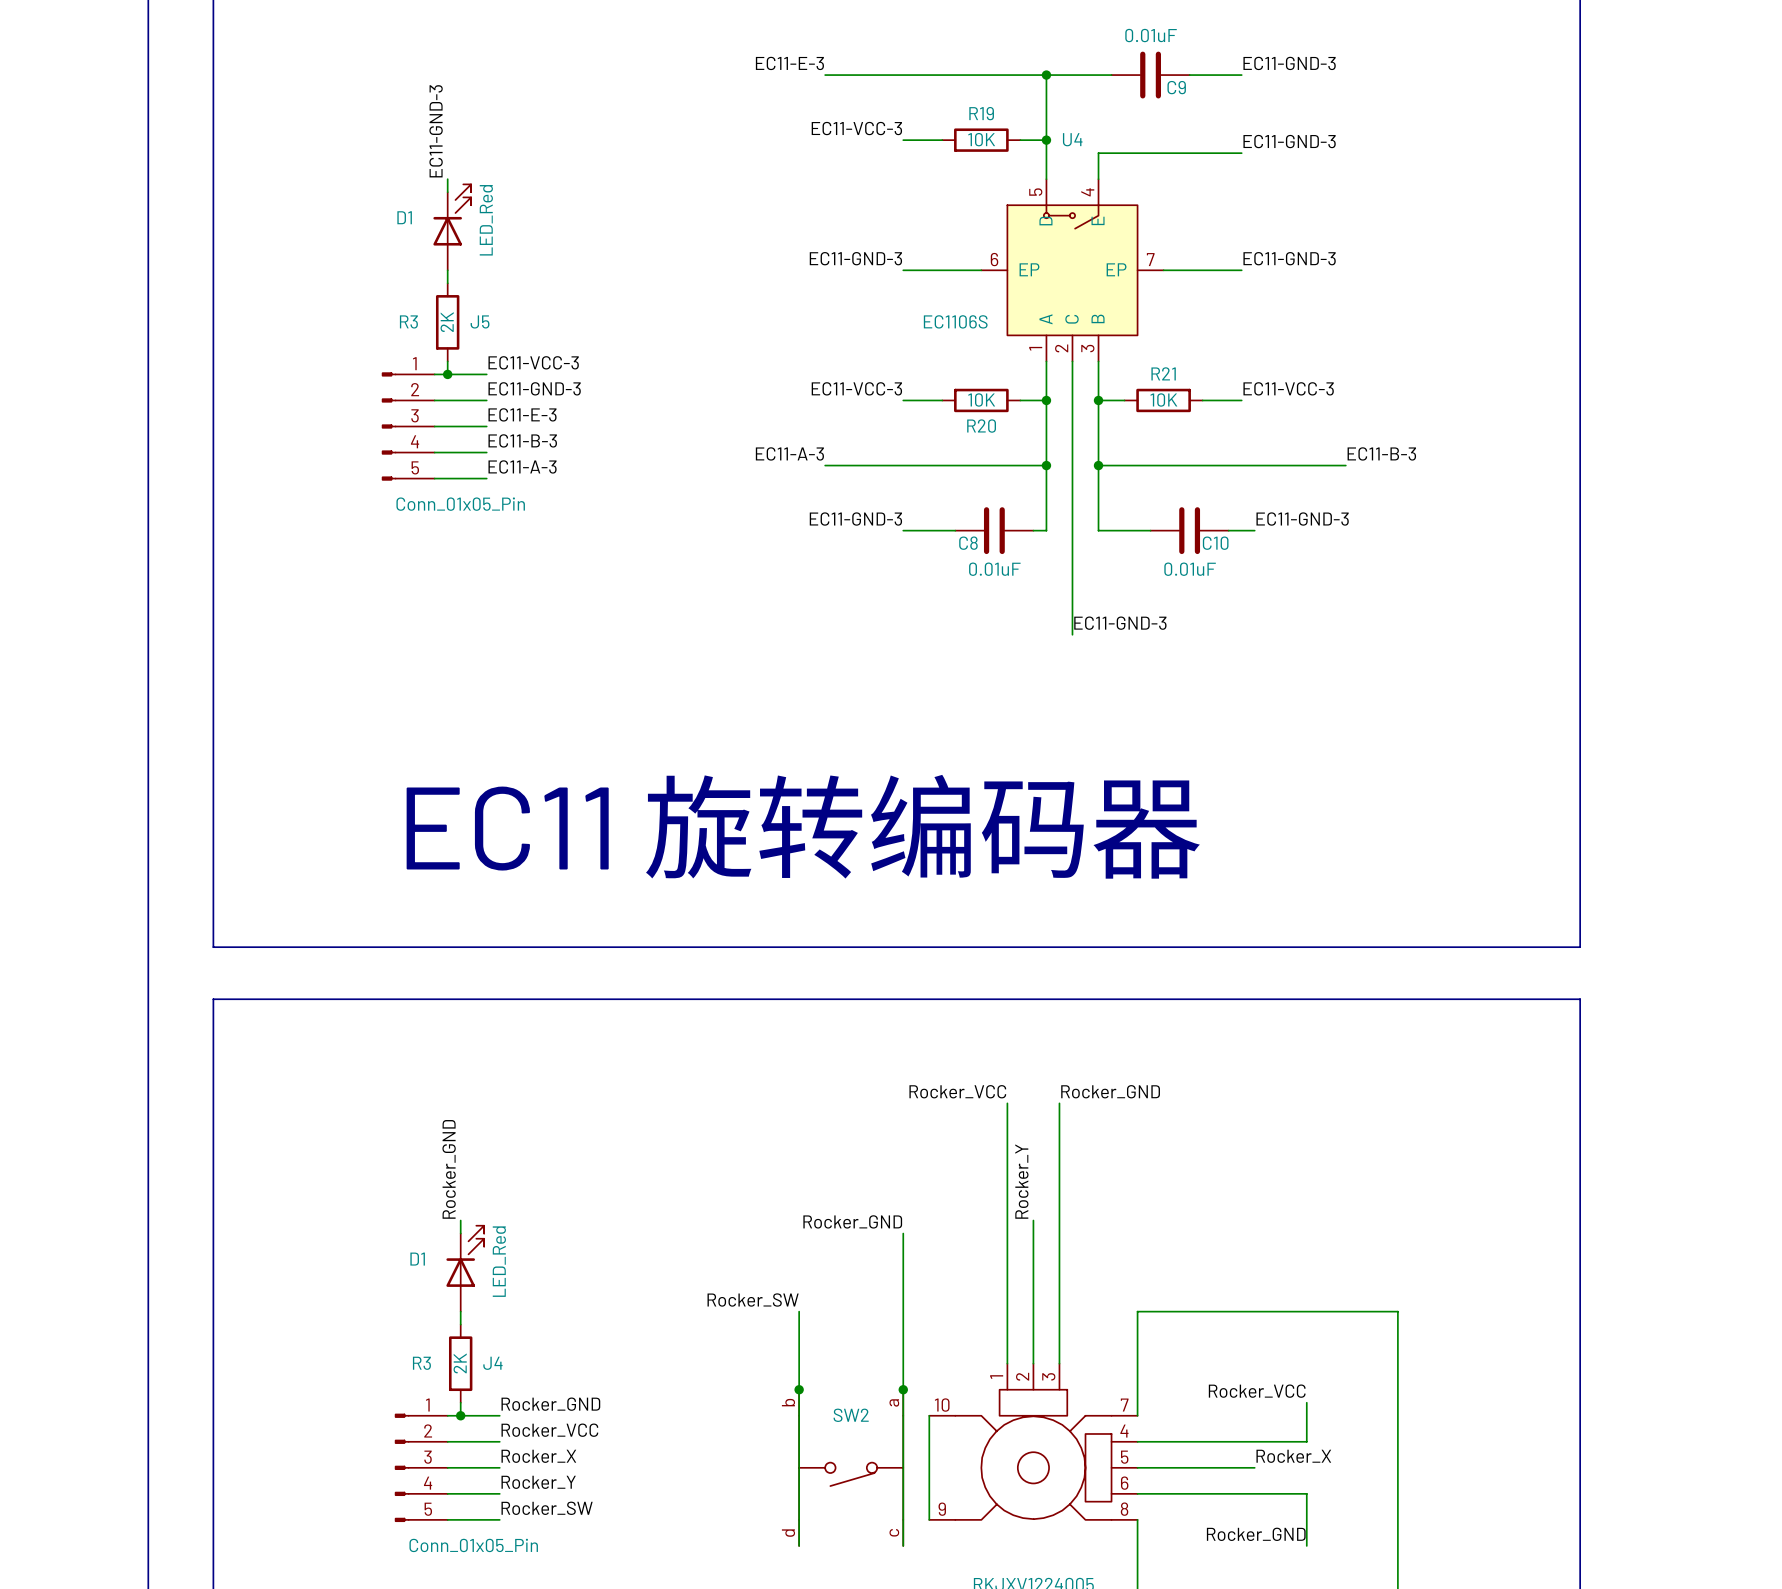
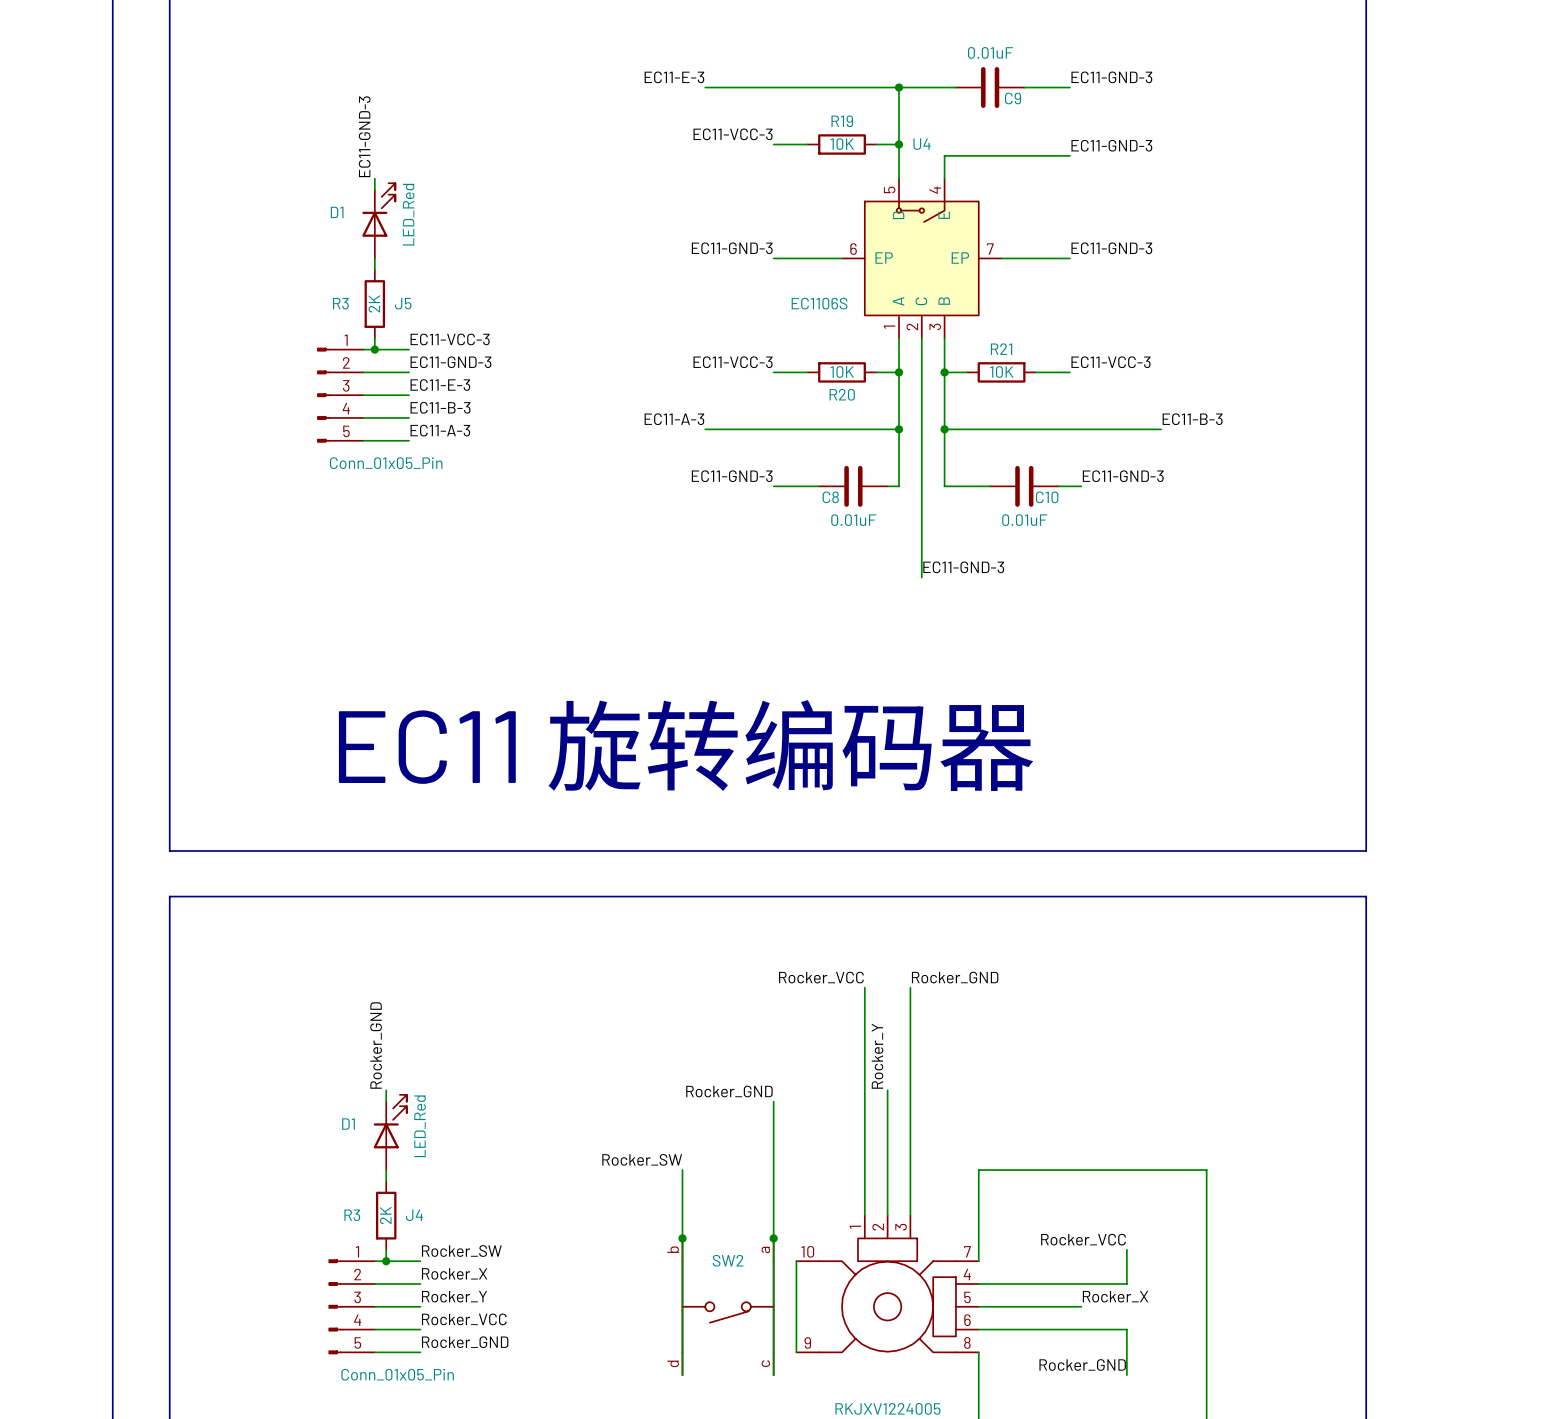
label: Rocker_GND (550, 1404) -> Rocker_SW (461, 1251)
label: Rocker_VCC (549, 1430) -> Rocker_X (454, 1273)
label: Rocker_X (538, 1456) -> Rocker_Y (454, 1296)
label: Rocker_Y (538, 1482) -> Rocker_VCC (464, 1319)
label: Rocker_SW (547, 1508) -> Rocker_GND (465, 1342)

